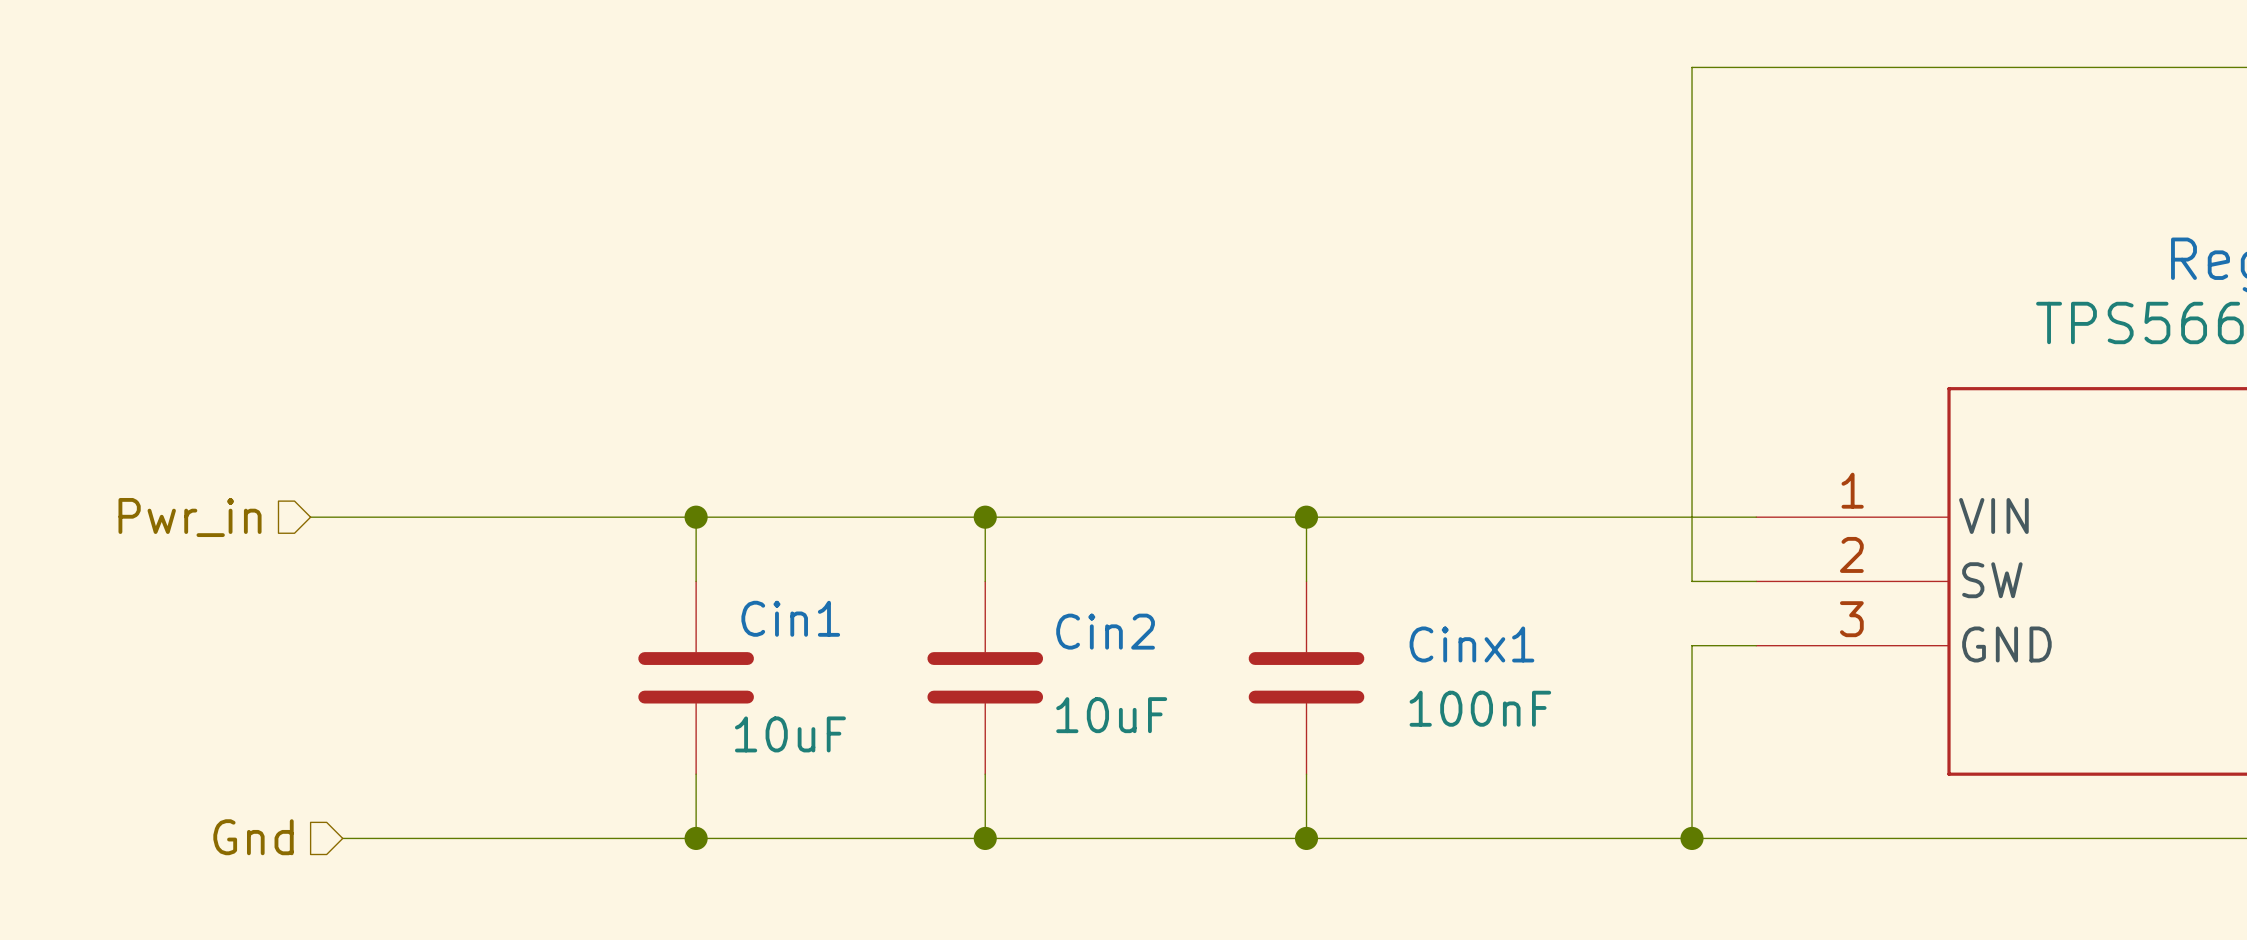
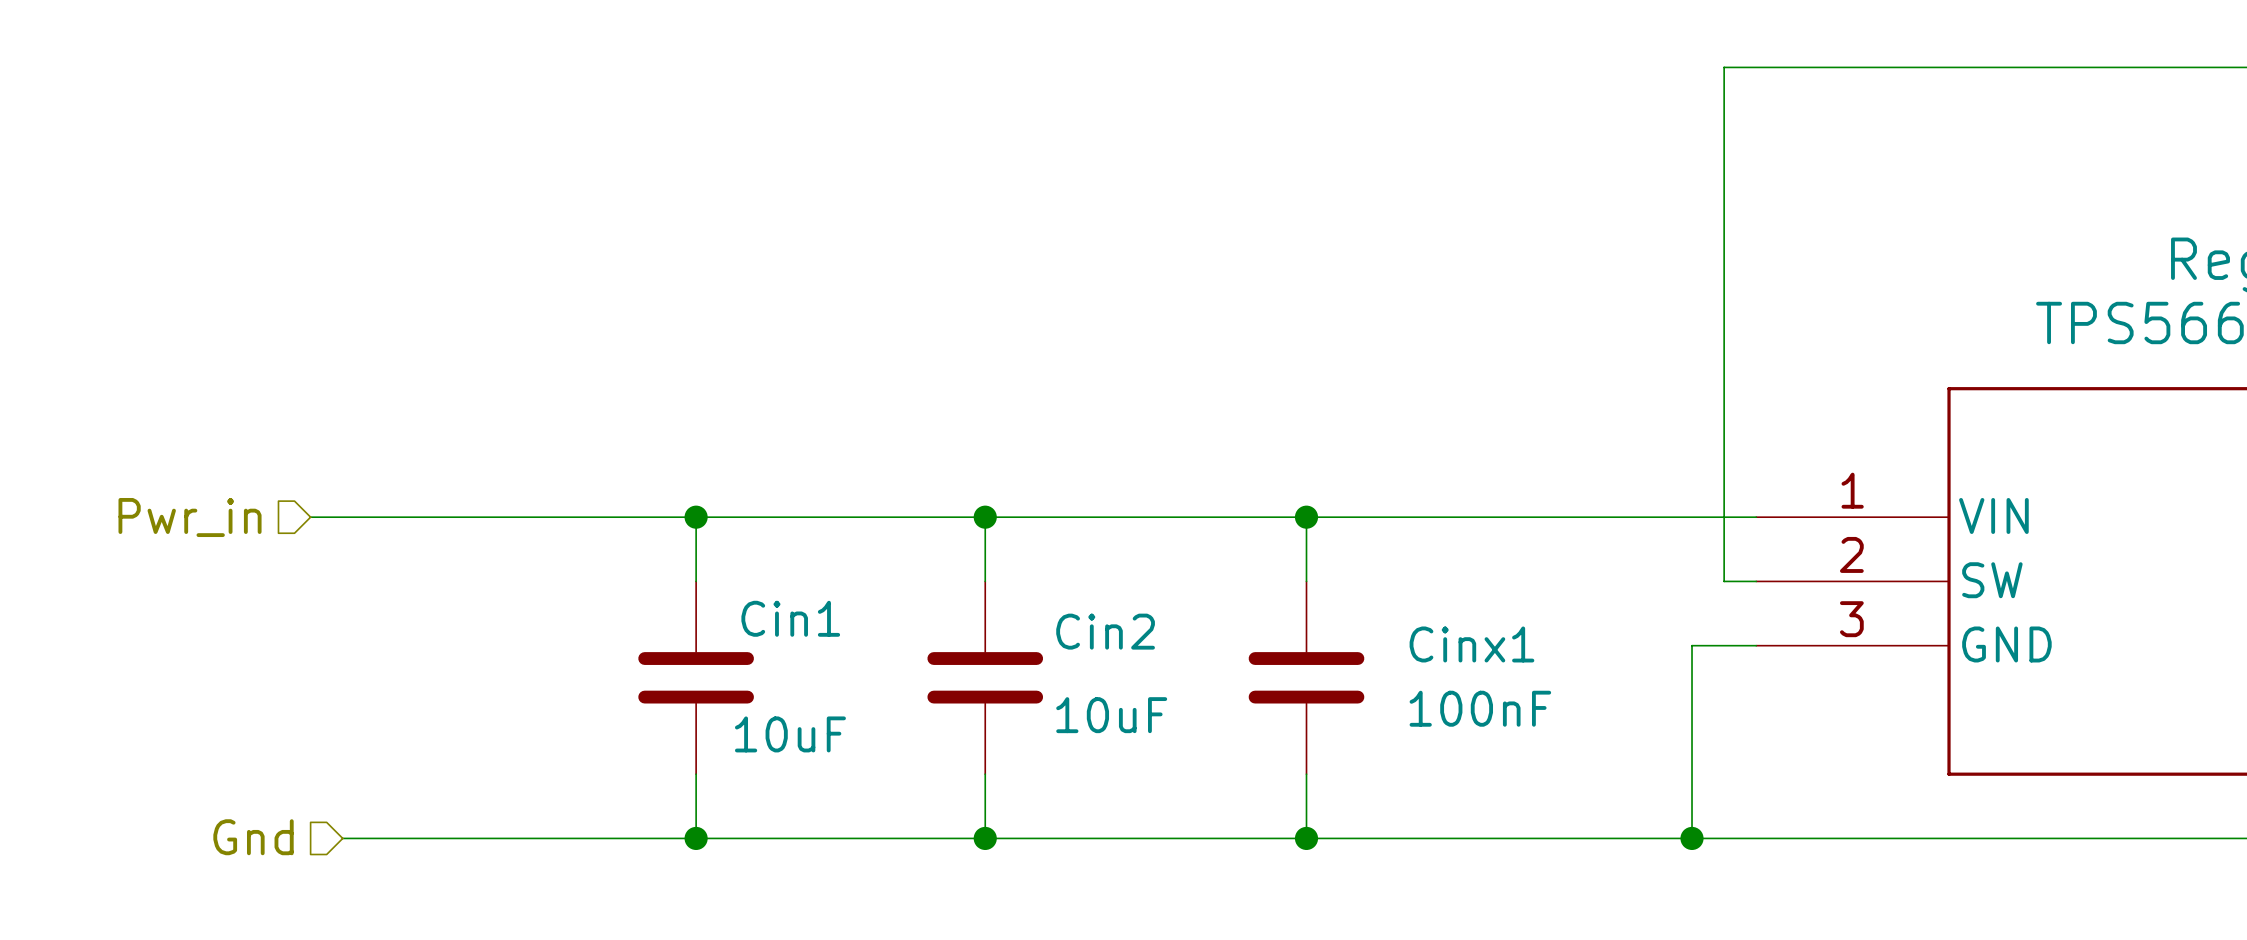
wire: (1724, 67) (1692, 67) (1692, 581) (1724, 581) -> (1724, 67) (1724, 581)

